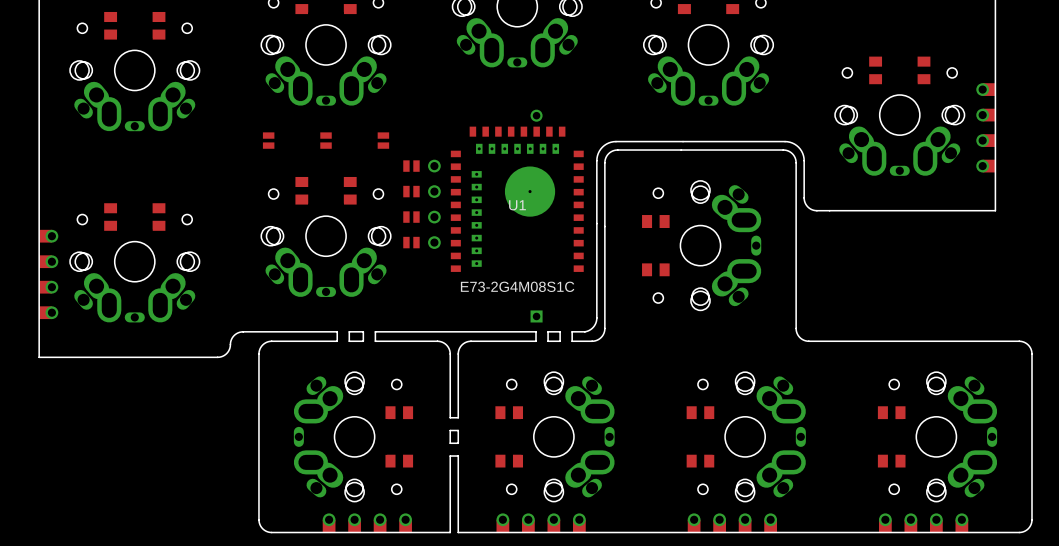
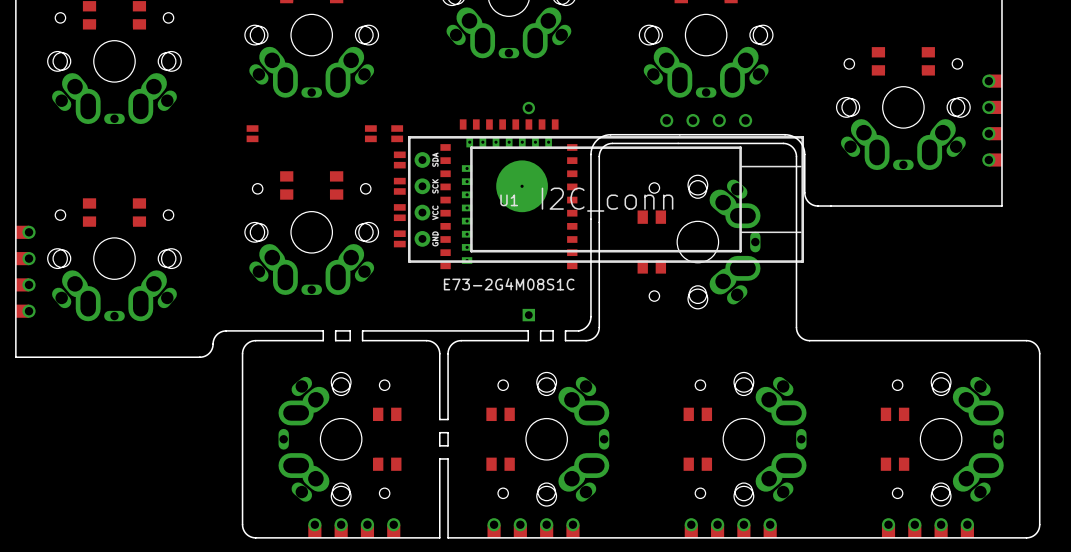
part: none -> (706, 120)
part position: (326, 140) -> (397, 133)
part rotation: 0° (411, 166) -> 90° clockwise (399, 159)
part rotation: 0° (411, 191) -> 90° clockwise (399, 186)
part: (434, 204) -> none
part: none -> I2C_conn (606, 199)
part rotation: 0° (411, 217) -> 90° clockwise (399, 212)
part rotation: 0° (411, 242) -> 90° clockwise (399, 238)

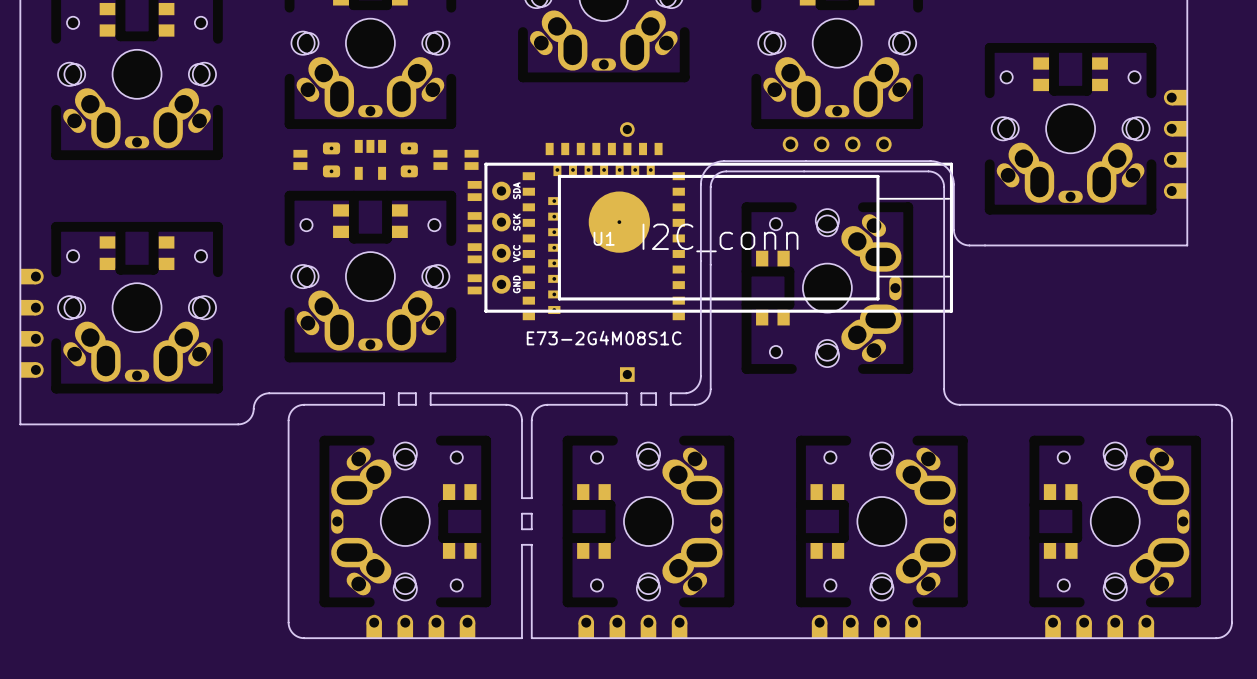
part: none -> (331, 159)
part: none -> (370, 159)
part: none -> (409, 159)

